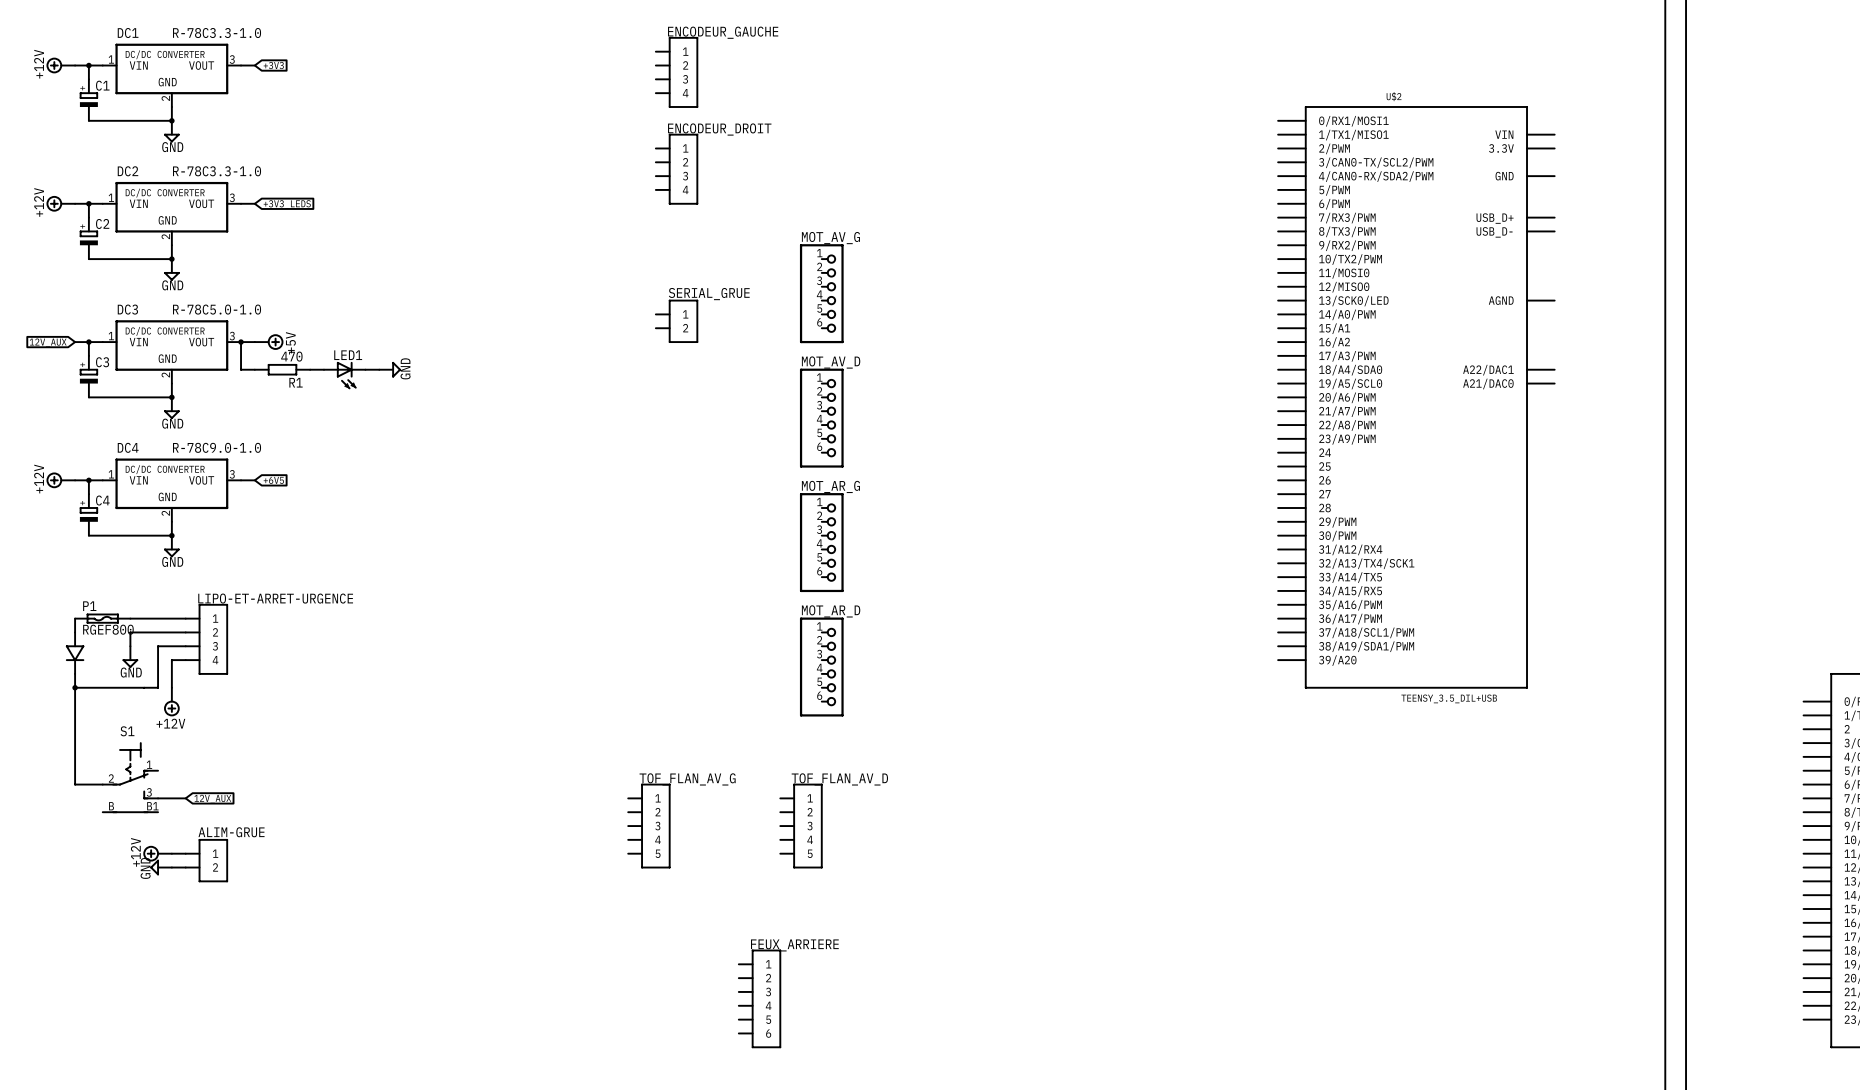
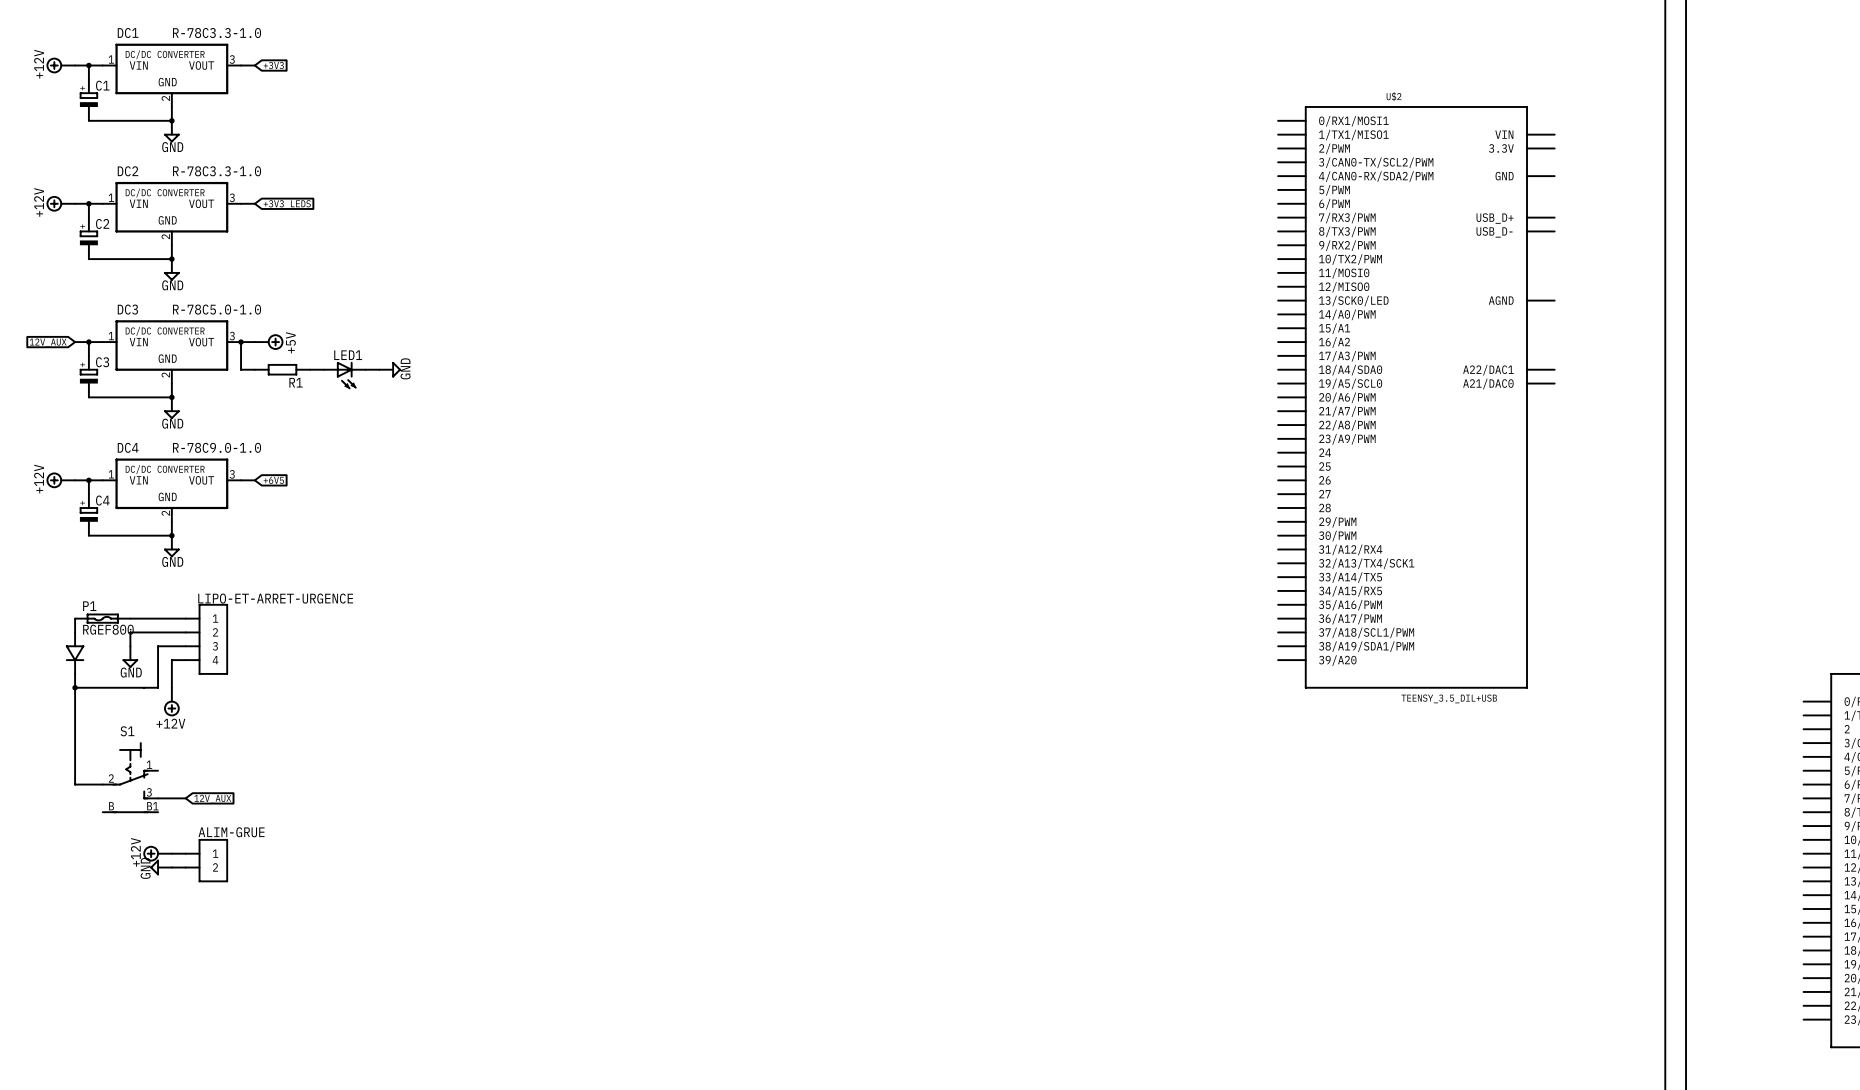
ENCODEUR_GAUCHE: (676, 72) -> none
ENCODEUR_DROIT: (676, 169) -> none
MOT_AV_G: (821, 293) -> none
SERIAL_GRUE: (676, 321) -> none
R1 value: 470 (291, 356) -> none
MOT_AV_D: (821, 418) -> none
MOT_AR_G: (821, 542) -> none
MOT_AR_D: (821, 667) -> none
TOF_FLAN_AV_G: (649, 826) -> none
TOF_FLAN_AV_D: (801, 826) -> none
FEUX_ARRIERE: (759, 998) -> none

